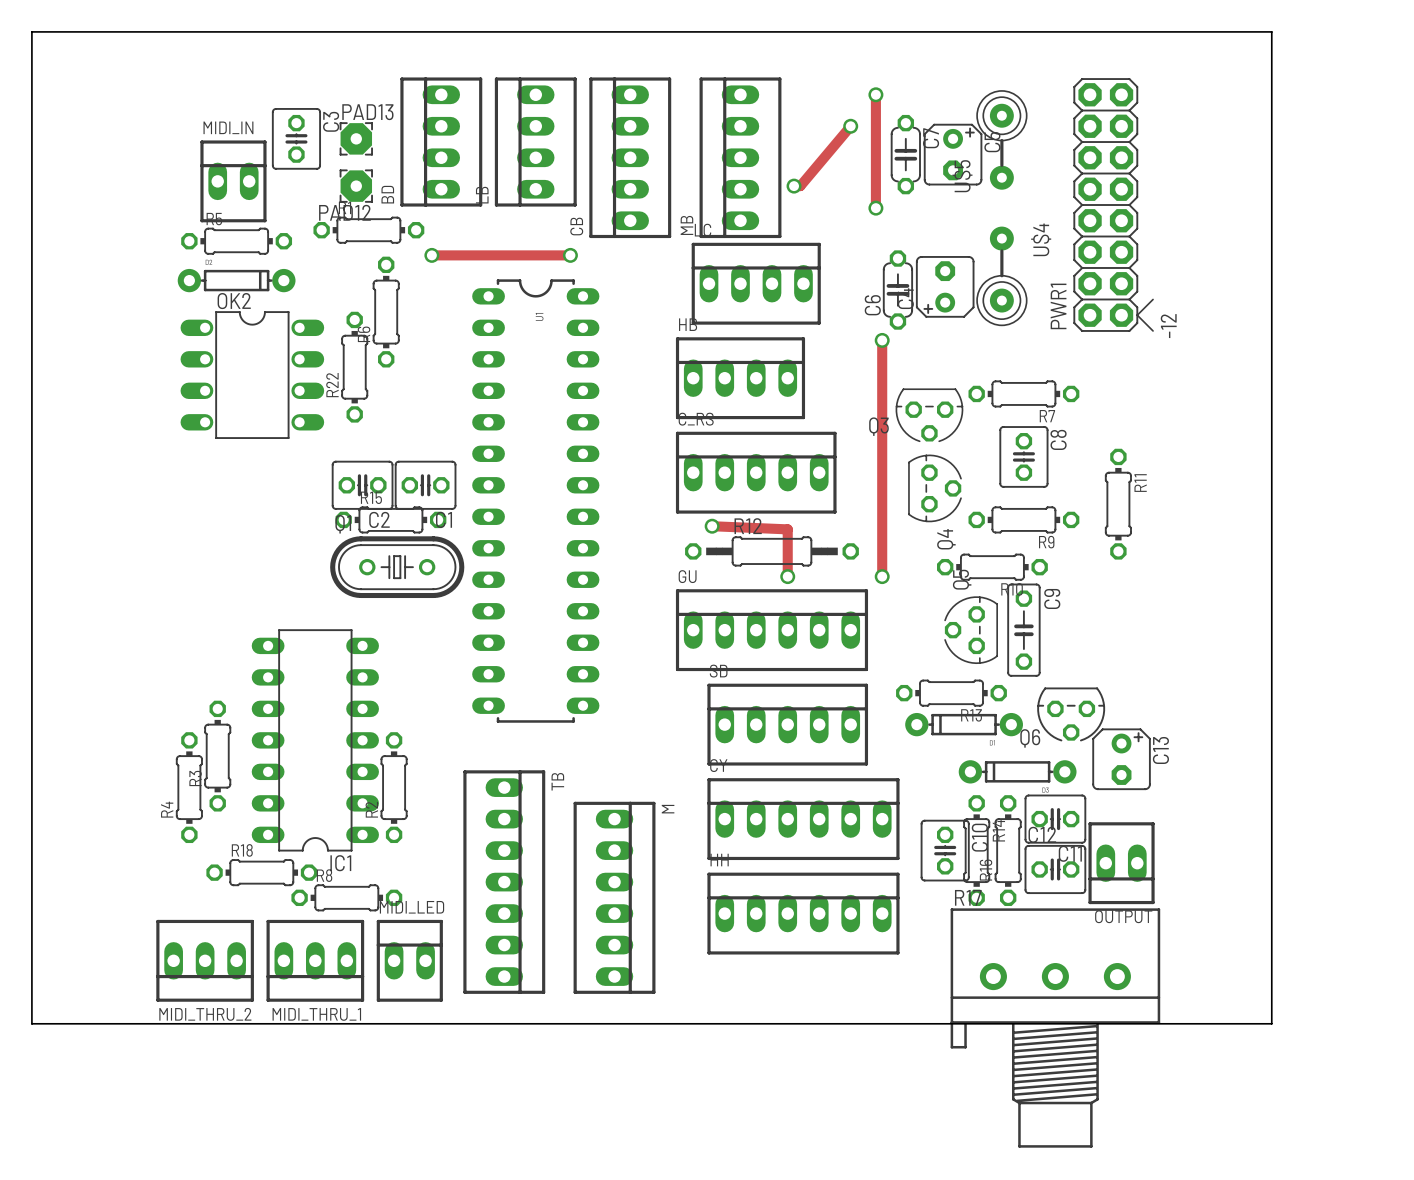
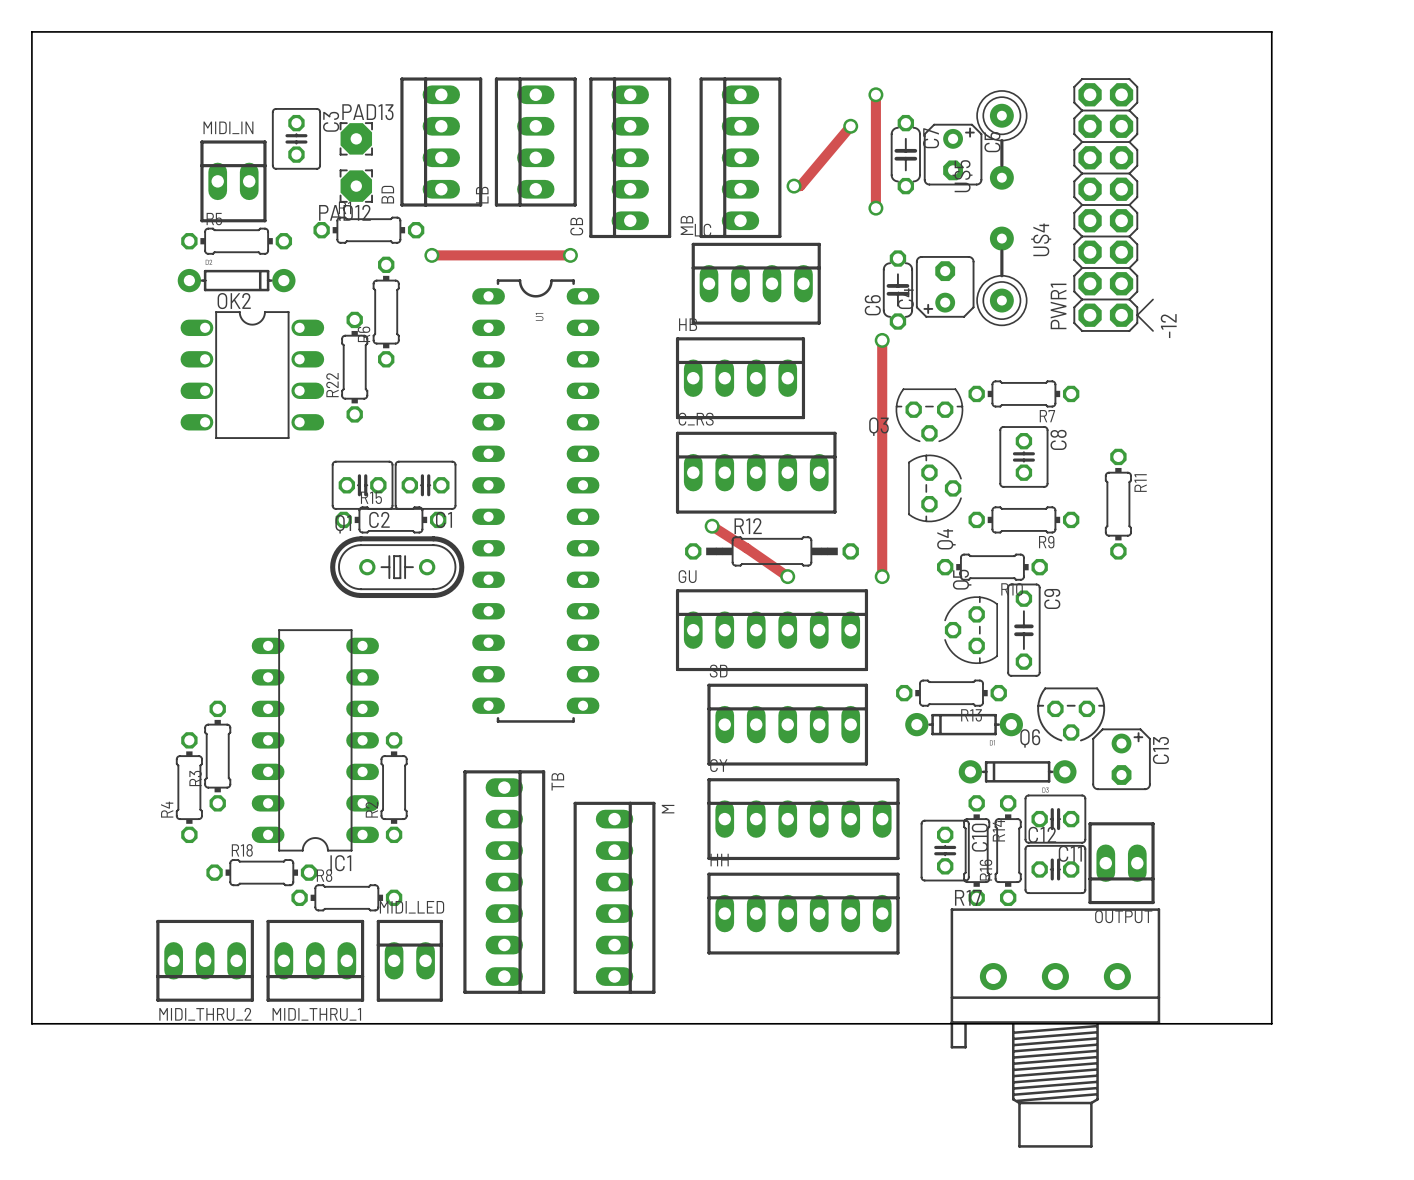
track: (712, 526) (787, 529) (787, 576) -> (712, 526) (787, 576)

